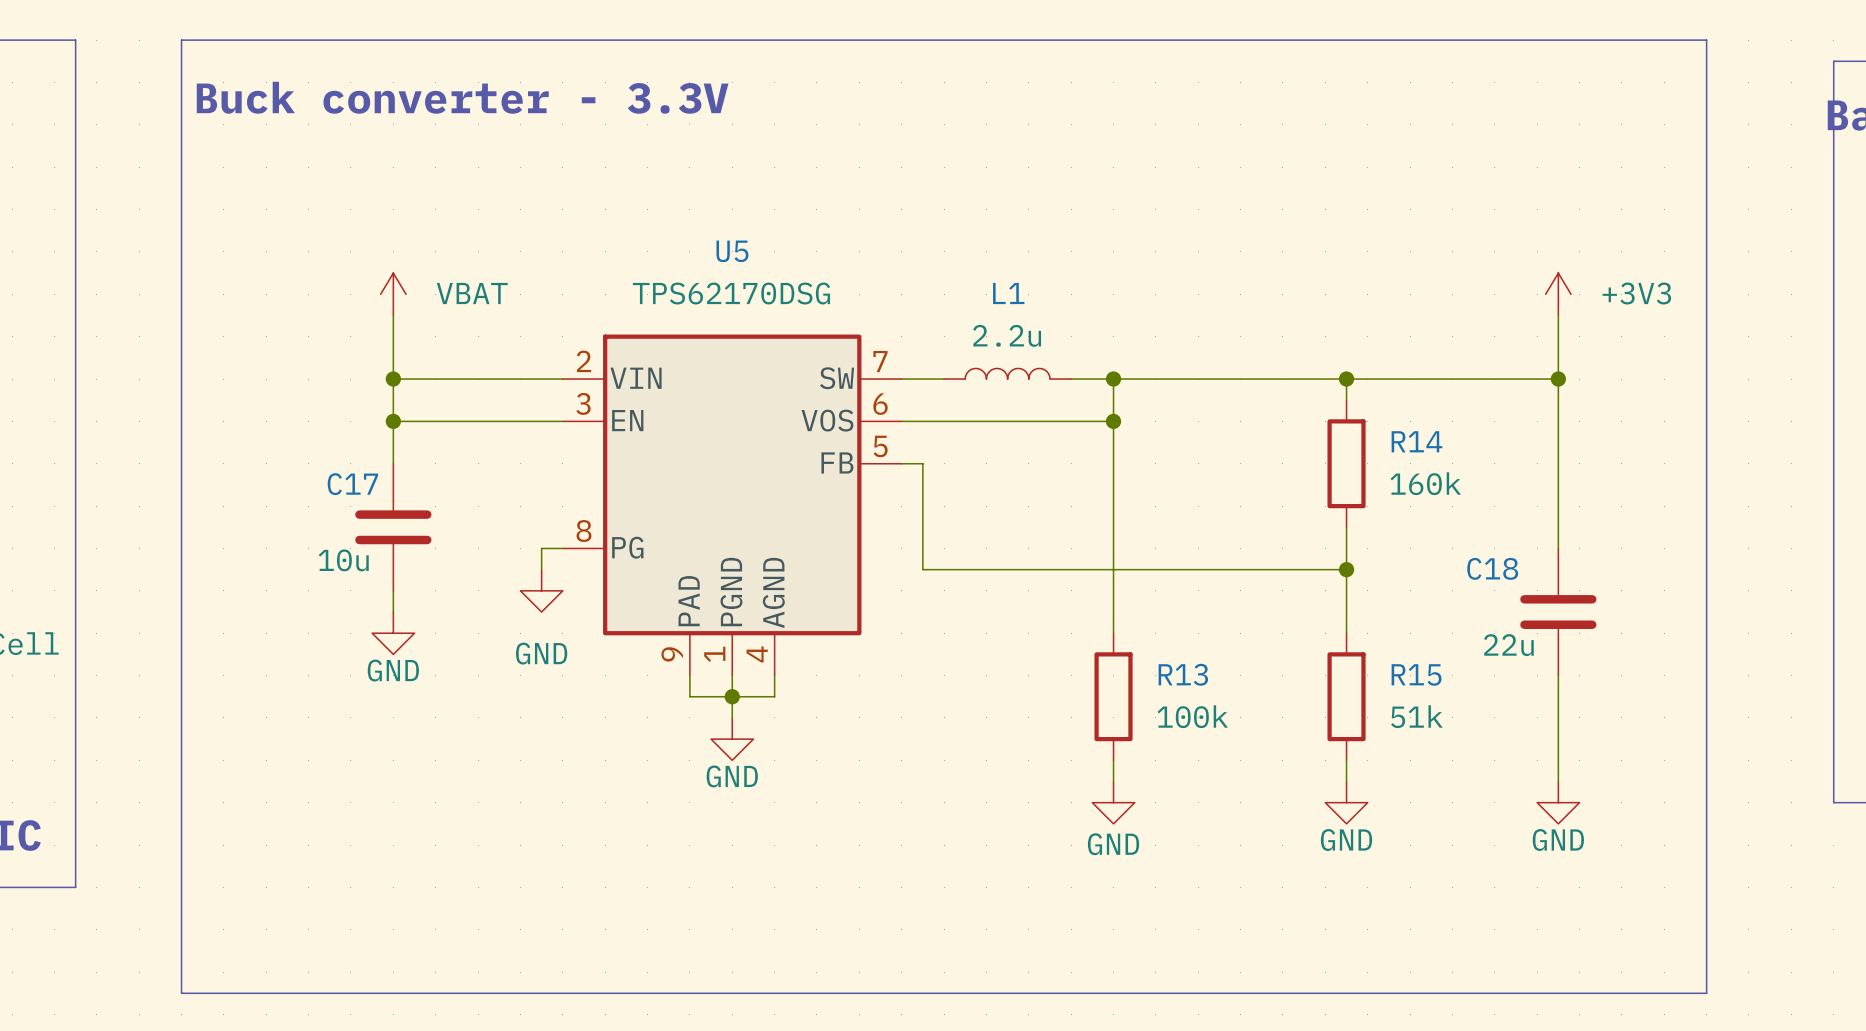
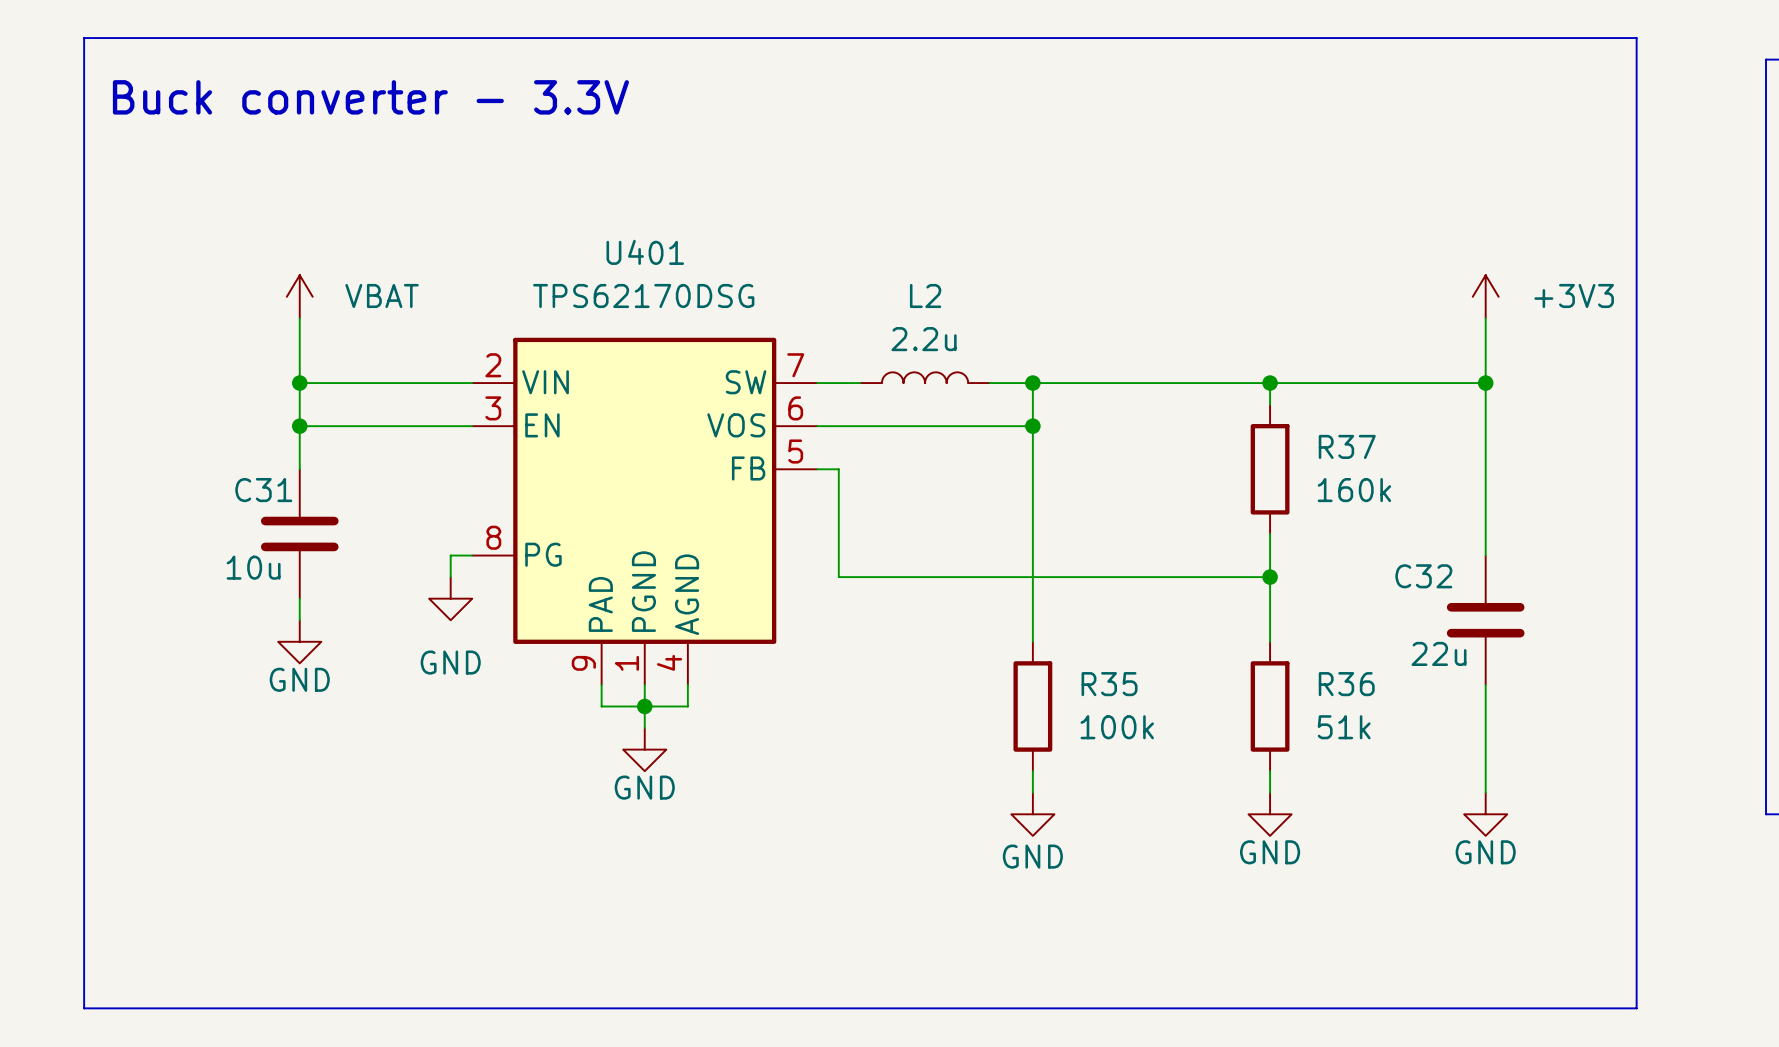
U5 name: U5 (732, 251) -> U401 (645, 252)
L1 name: L1 (1008, 293) -> L2 (925, 295)
R14 name: R14 (1417, 441) -> R37 (1347, 446)
C17 name: C17 (352, 484) -> C31 (263, 490)
C18 name: C18 (1492, 568) -> C32 (1423, 576)
R13 name: R13 (1183, 674) -> R35 (1109, 684)
R15 name: R15 (1416, 674) -> R36 (1346, 684)

